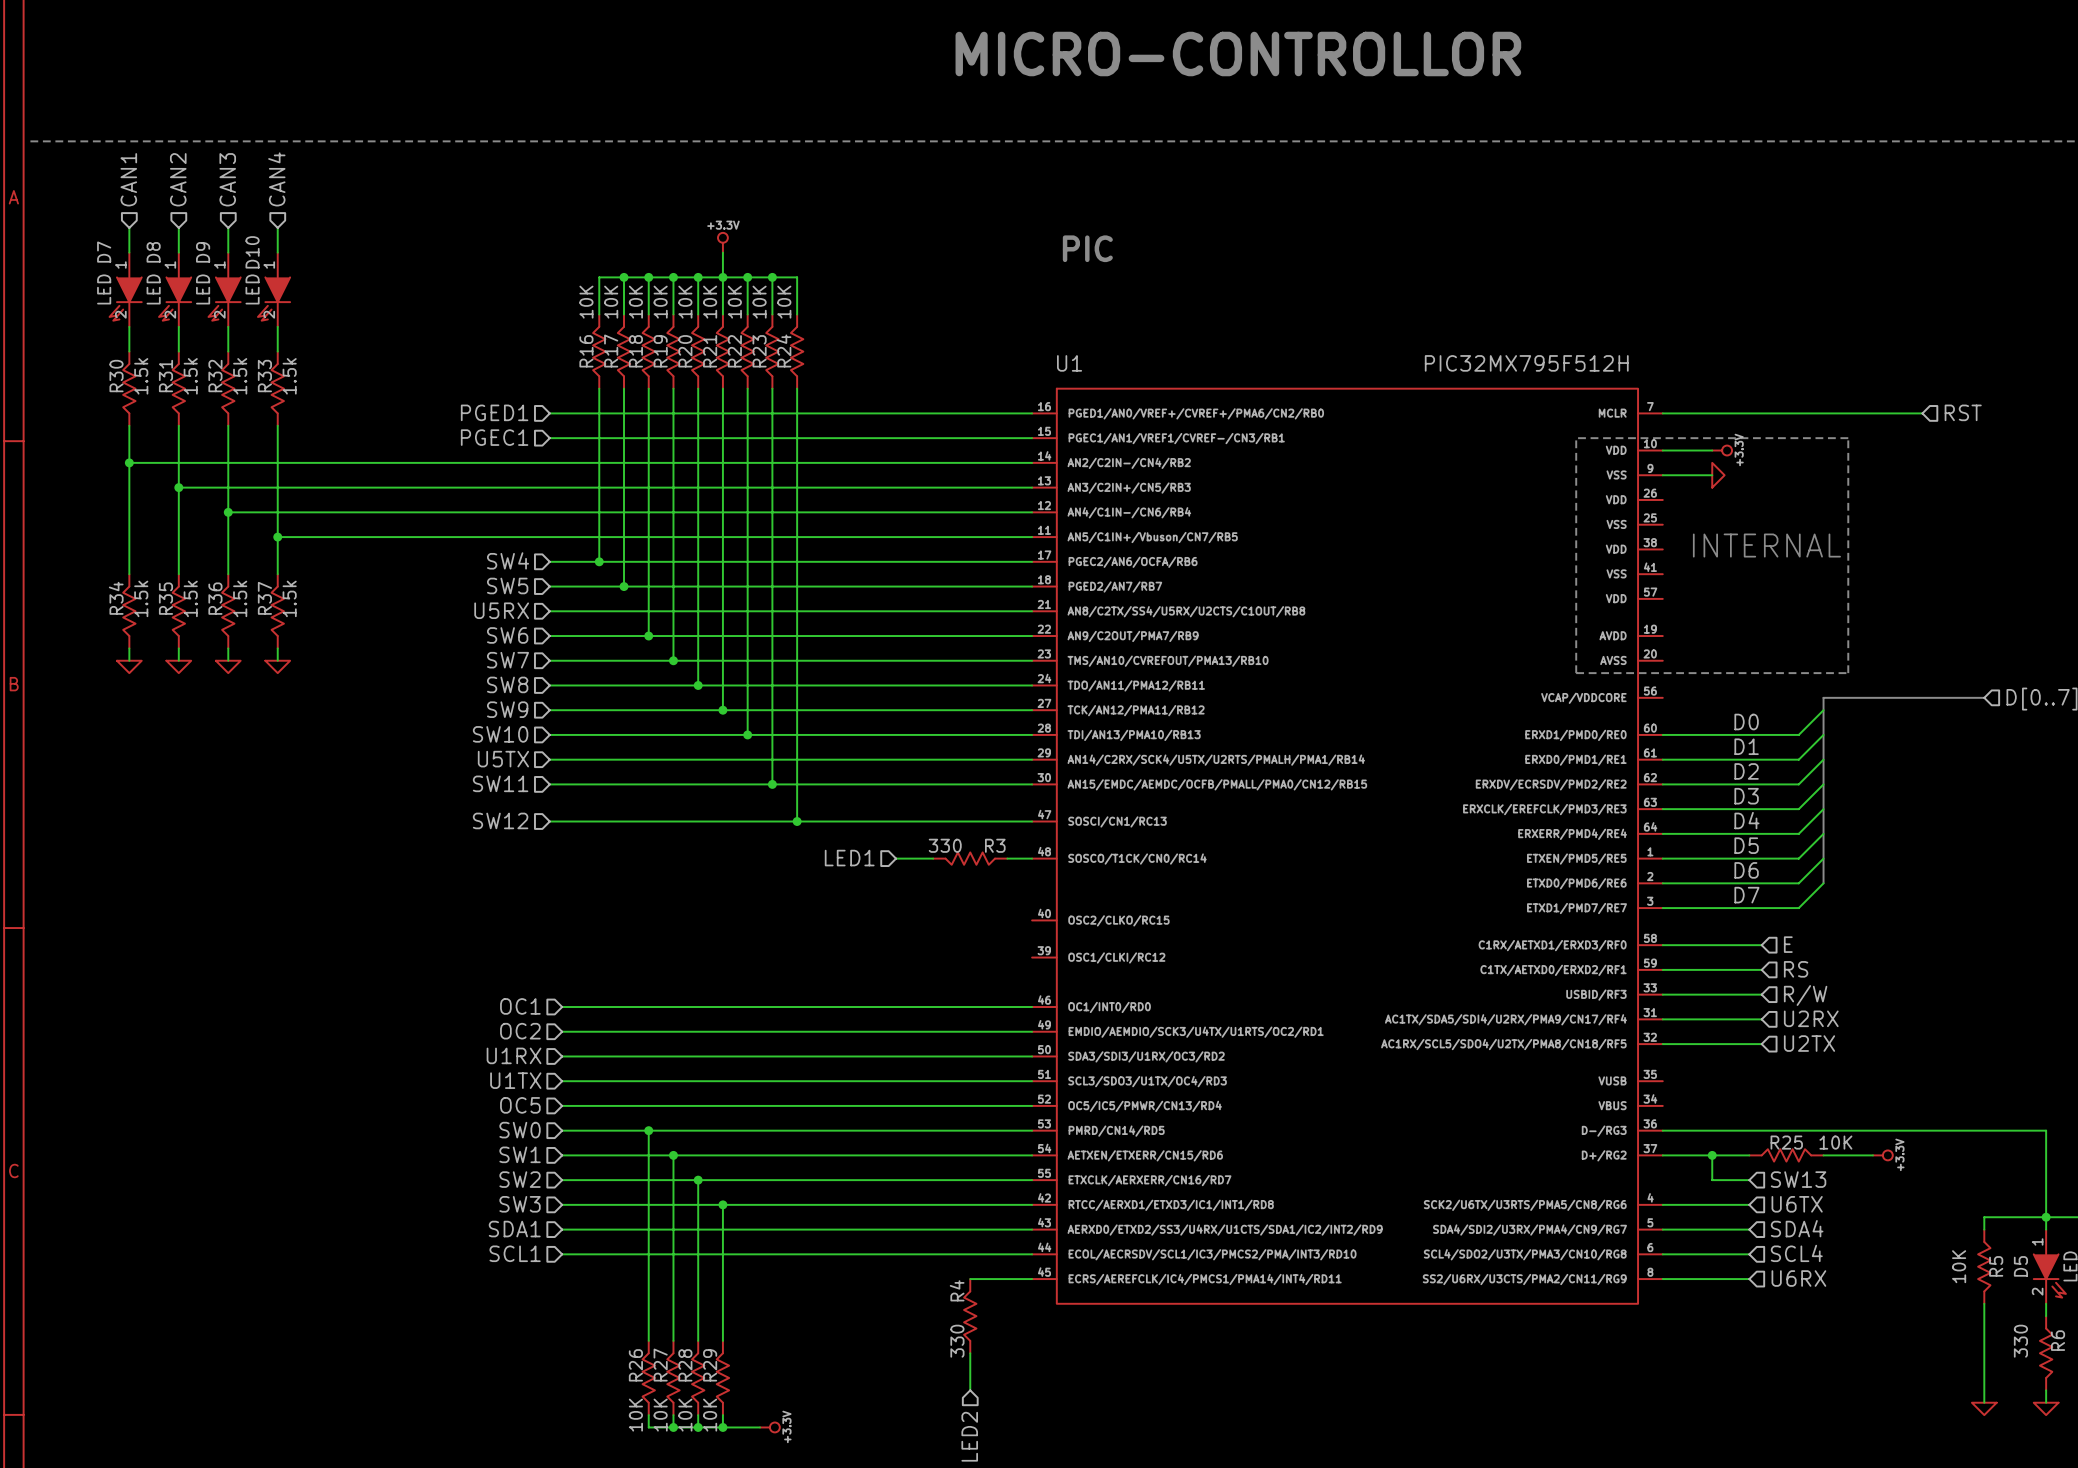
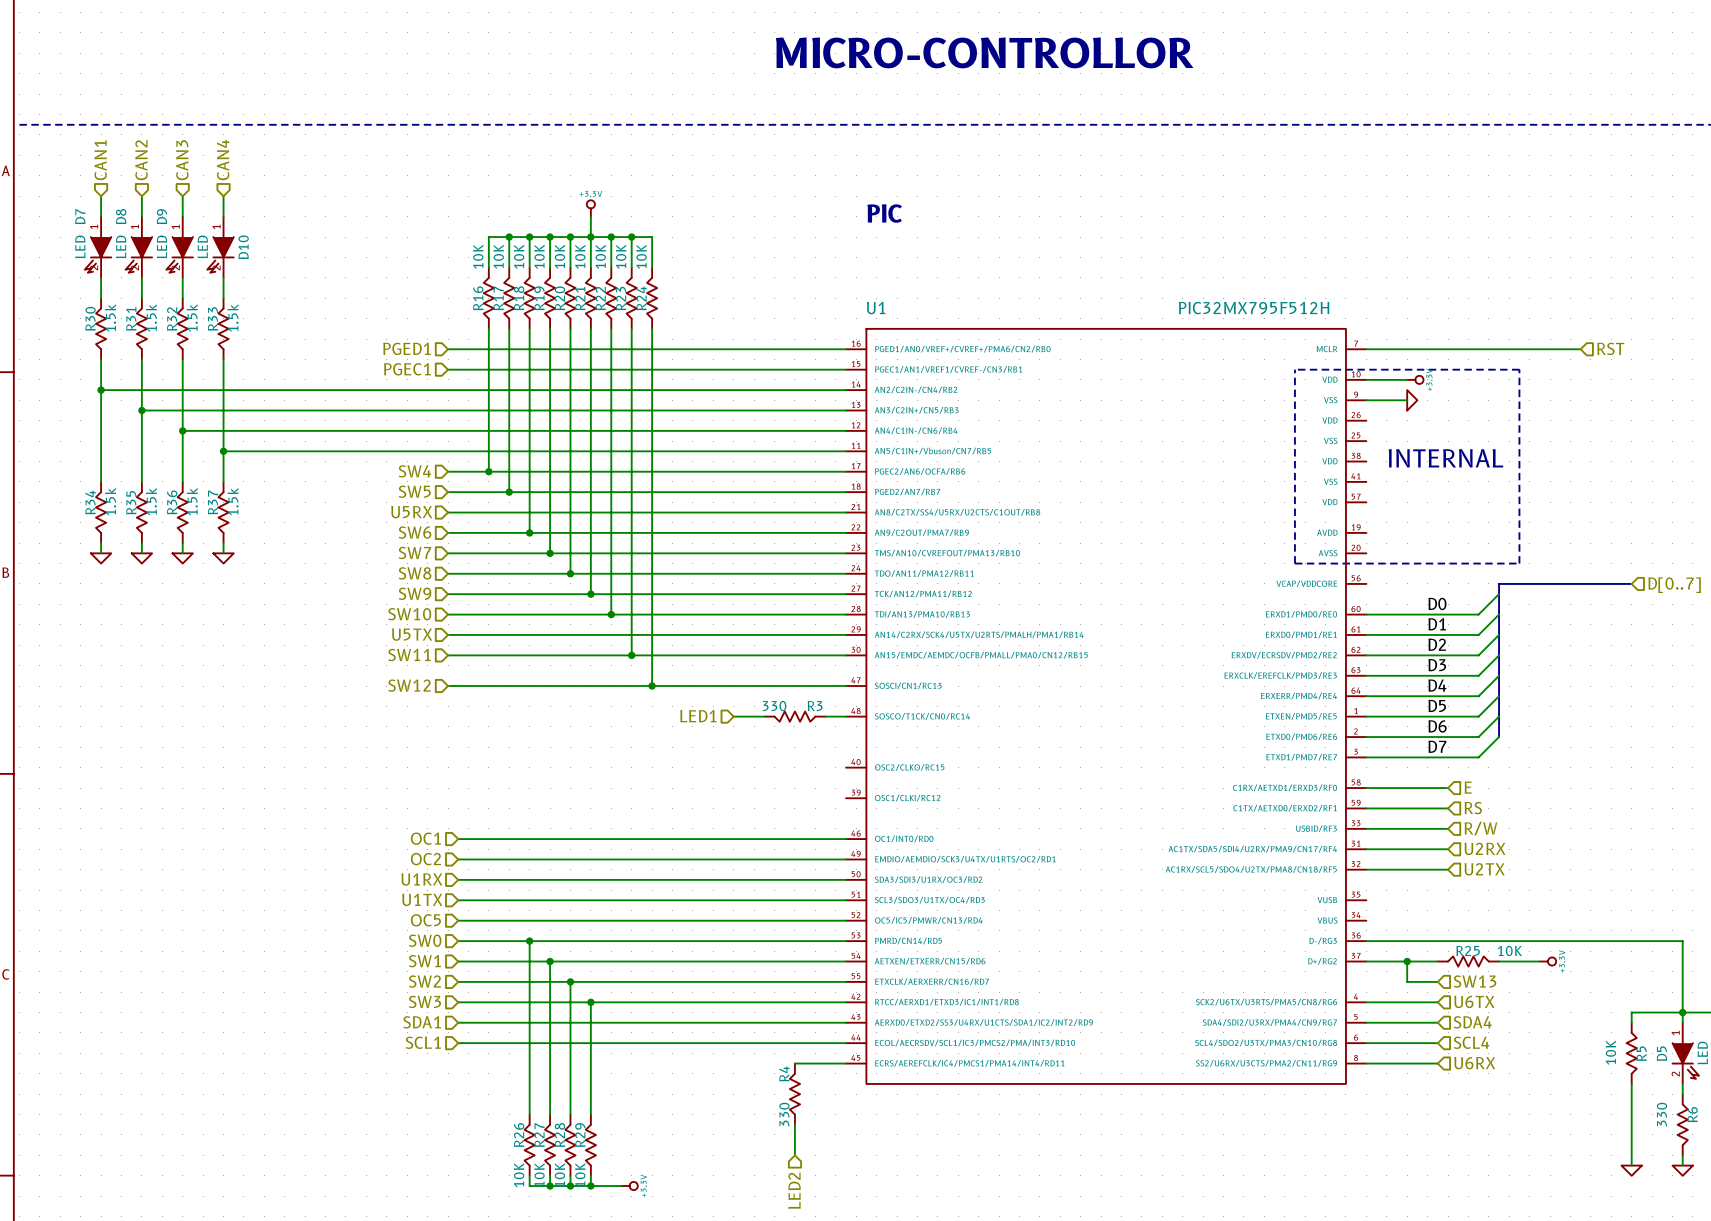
D10 name position: D10 (252, 252) -> D10 (243, 247)

